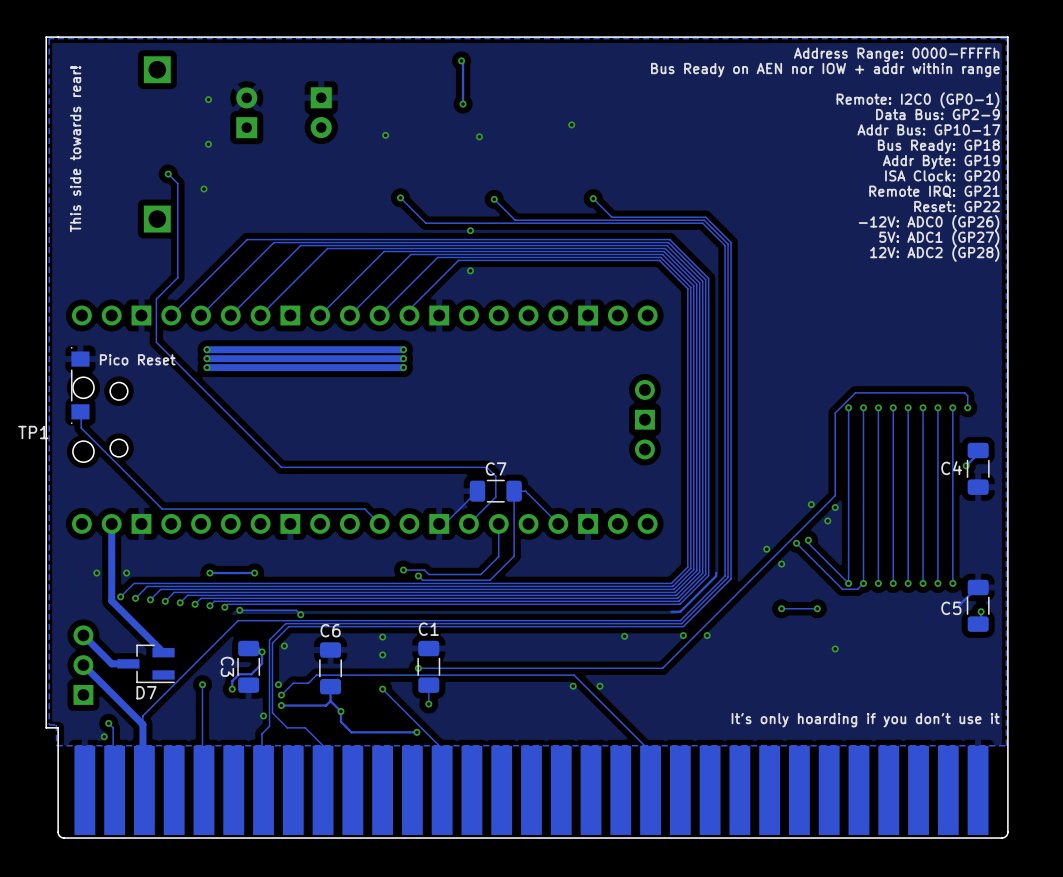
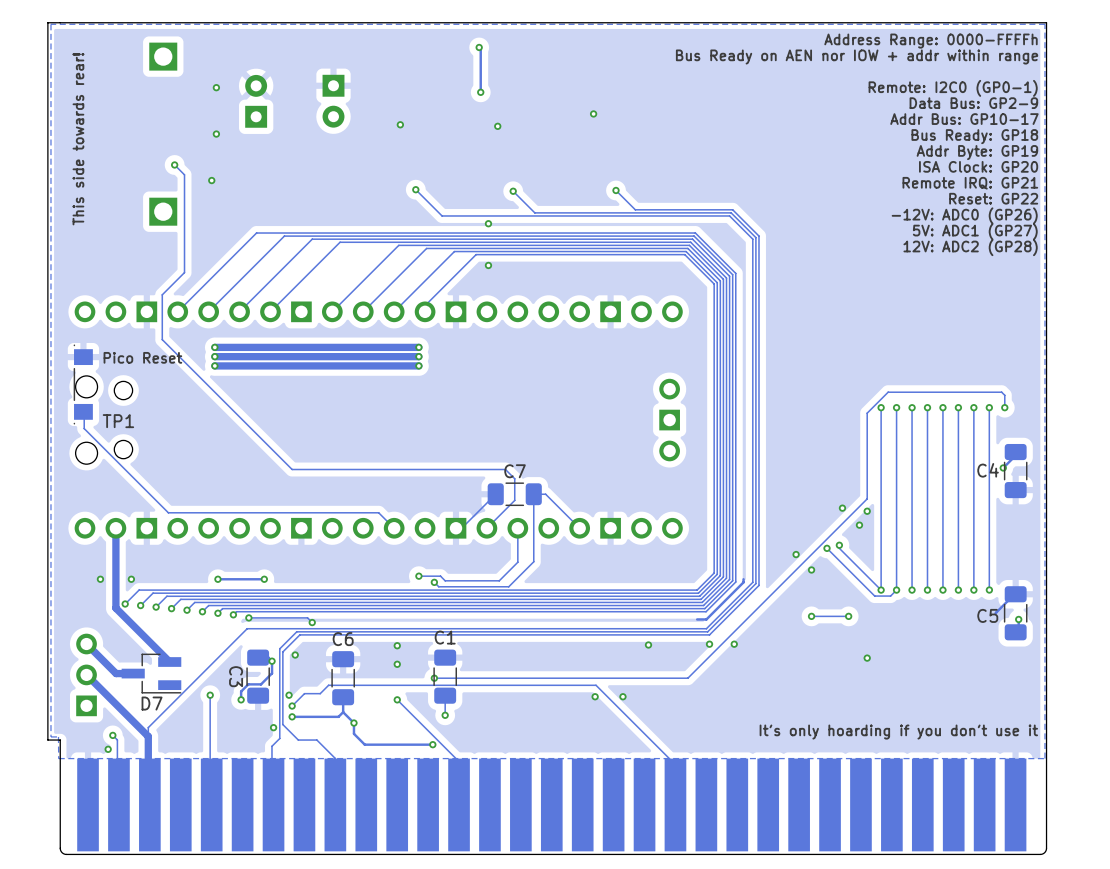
TP1 name position: TP1 (33, 432) -> TP1 (118, 421)

